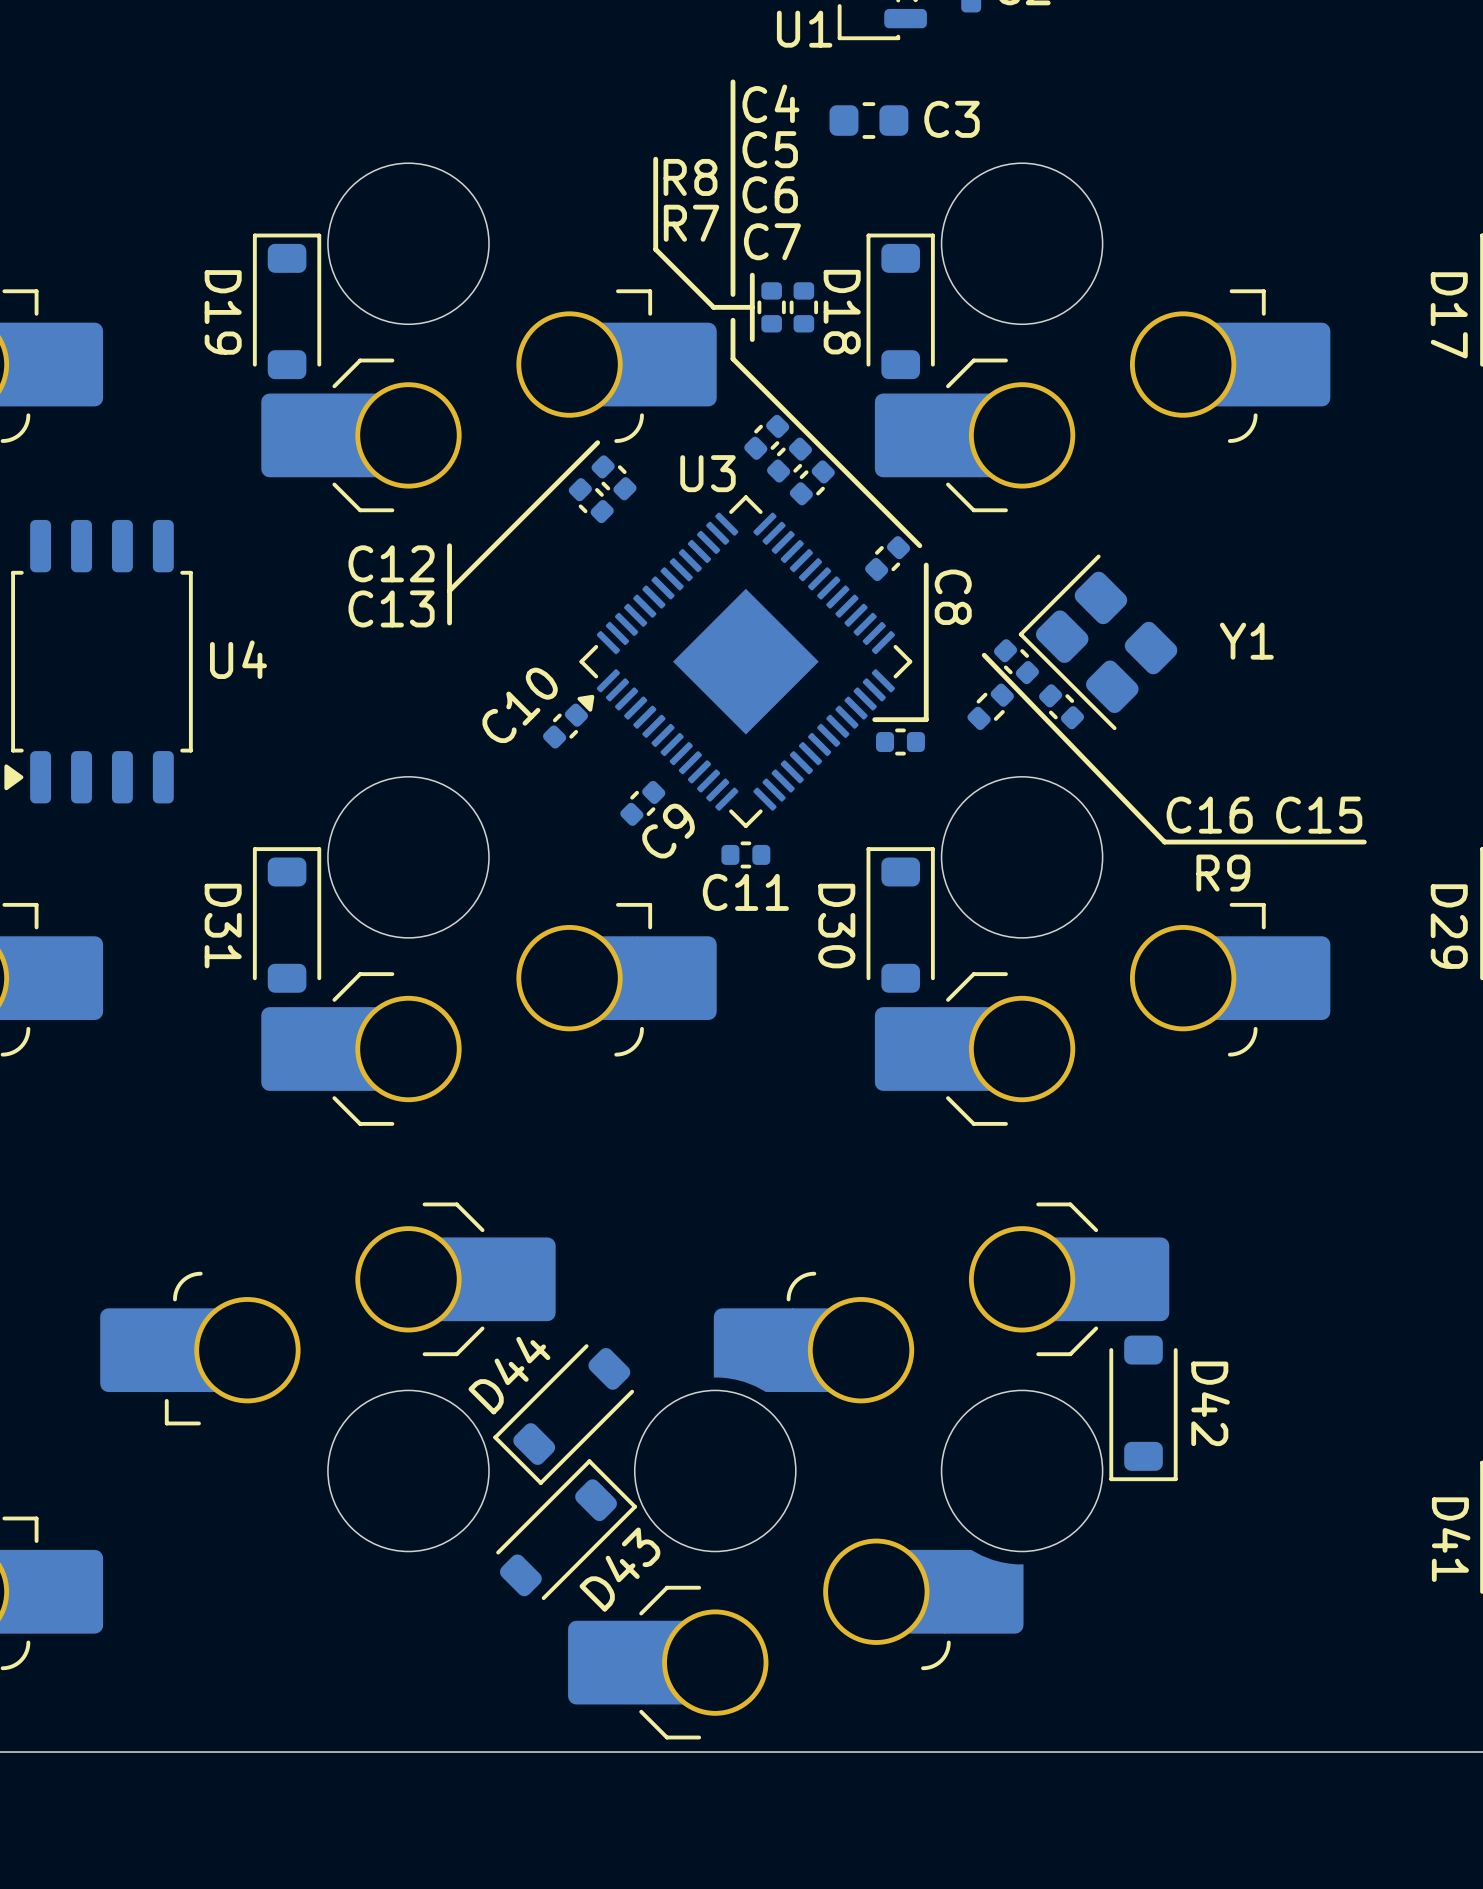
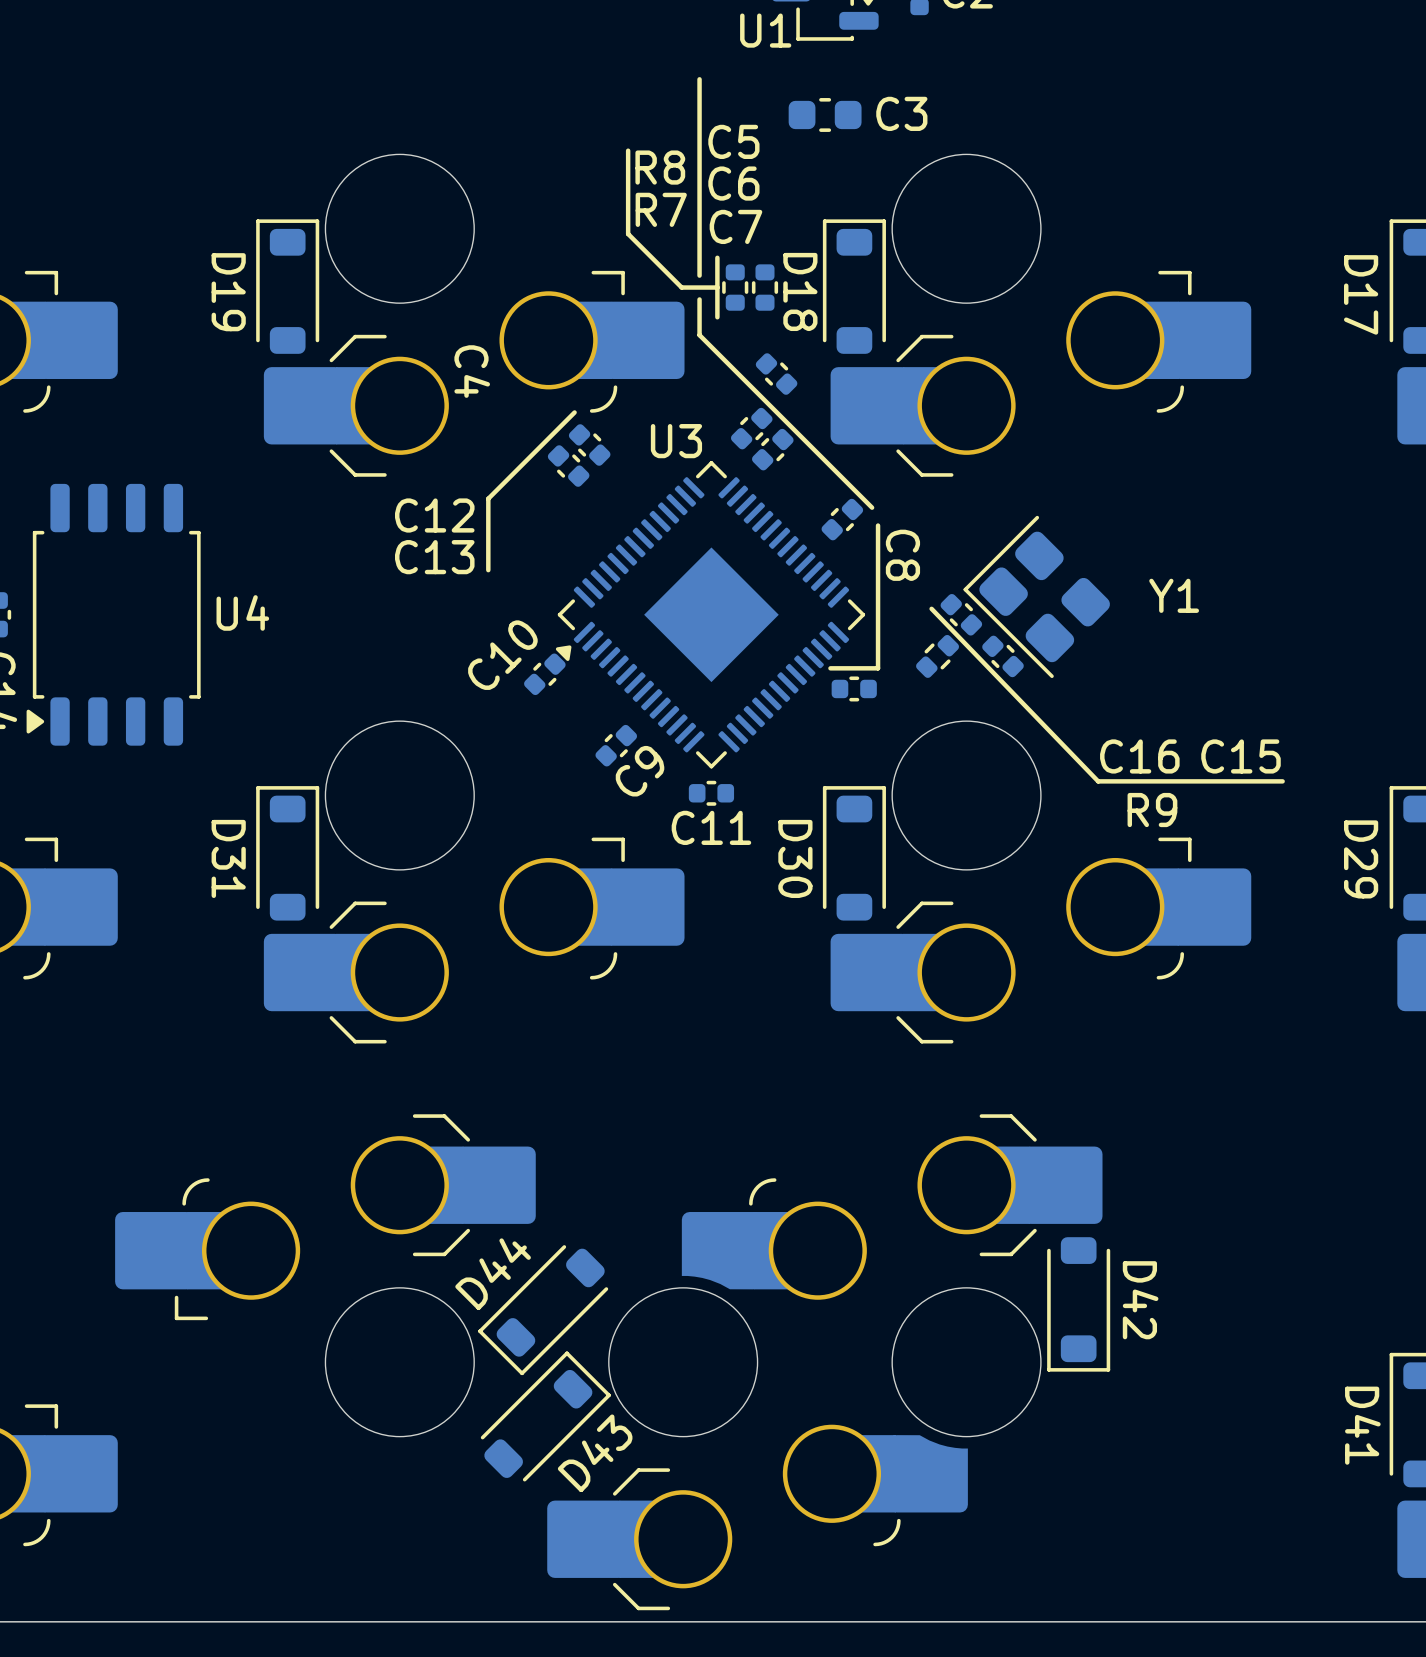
C4 name position: C4 (770, 103) -> C4 (472, 371)
C4 rotation: 0° (766, 437) -> 90° clockwise (776, 374)
C4 position: (766, 437) -> (776, 374)
line: (504, 536) (449, 590) -> (488, 498) (488, 570)
line: (449, 545) (449, 623) -> none
C12 name position: C12 (391, 563) -> C12 (434, 515)
C13 name position: C13 (391, 608) -> C13 (434, 557)

